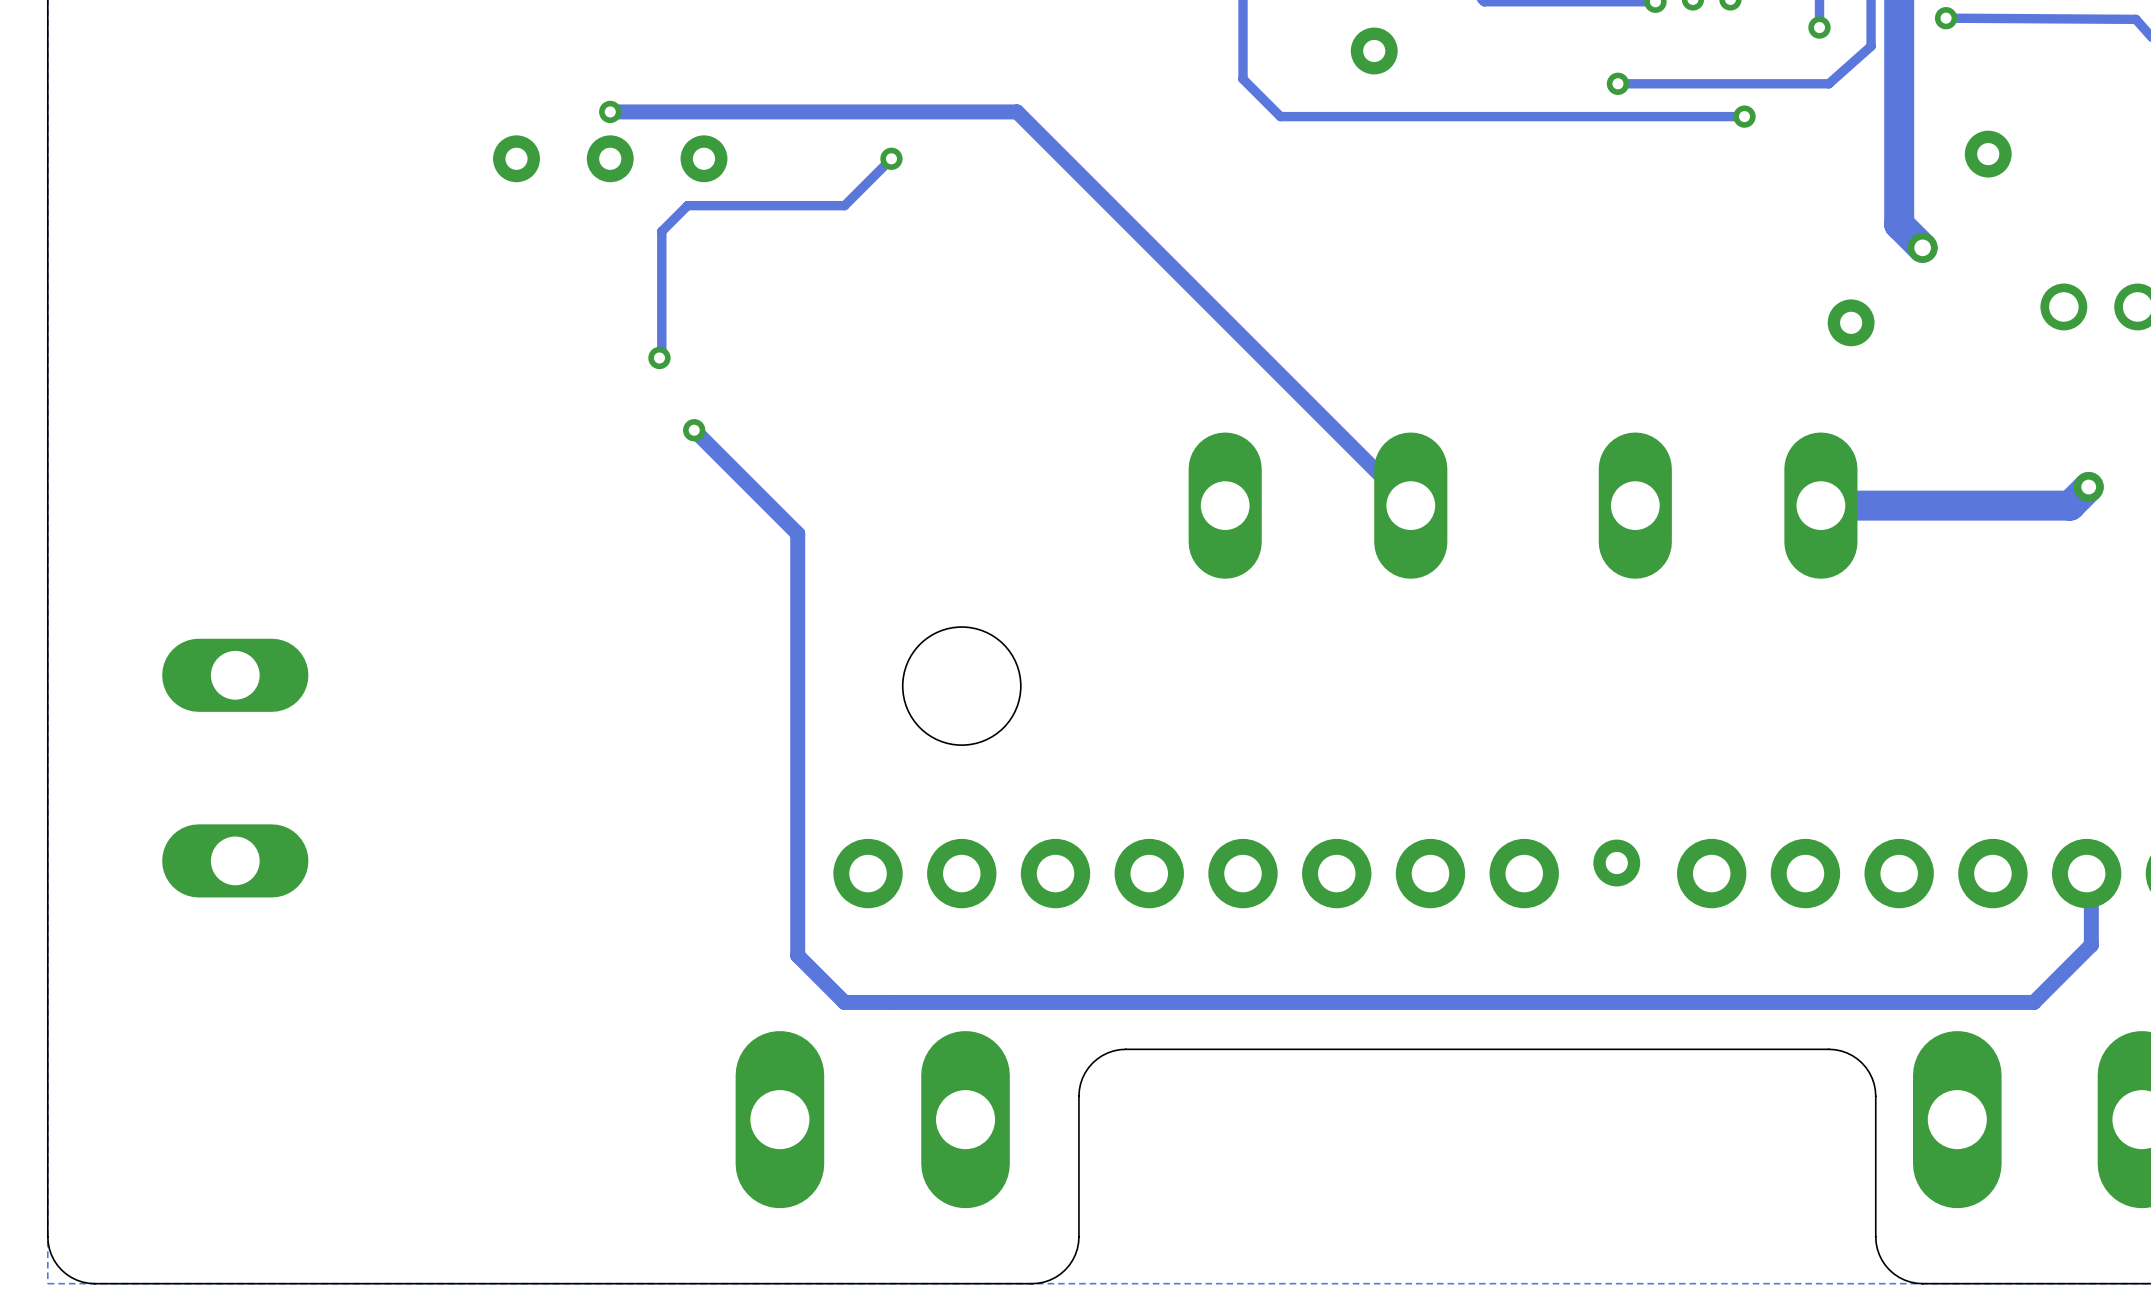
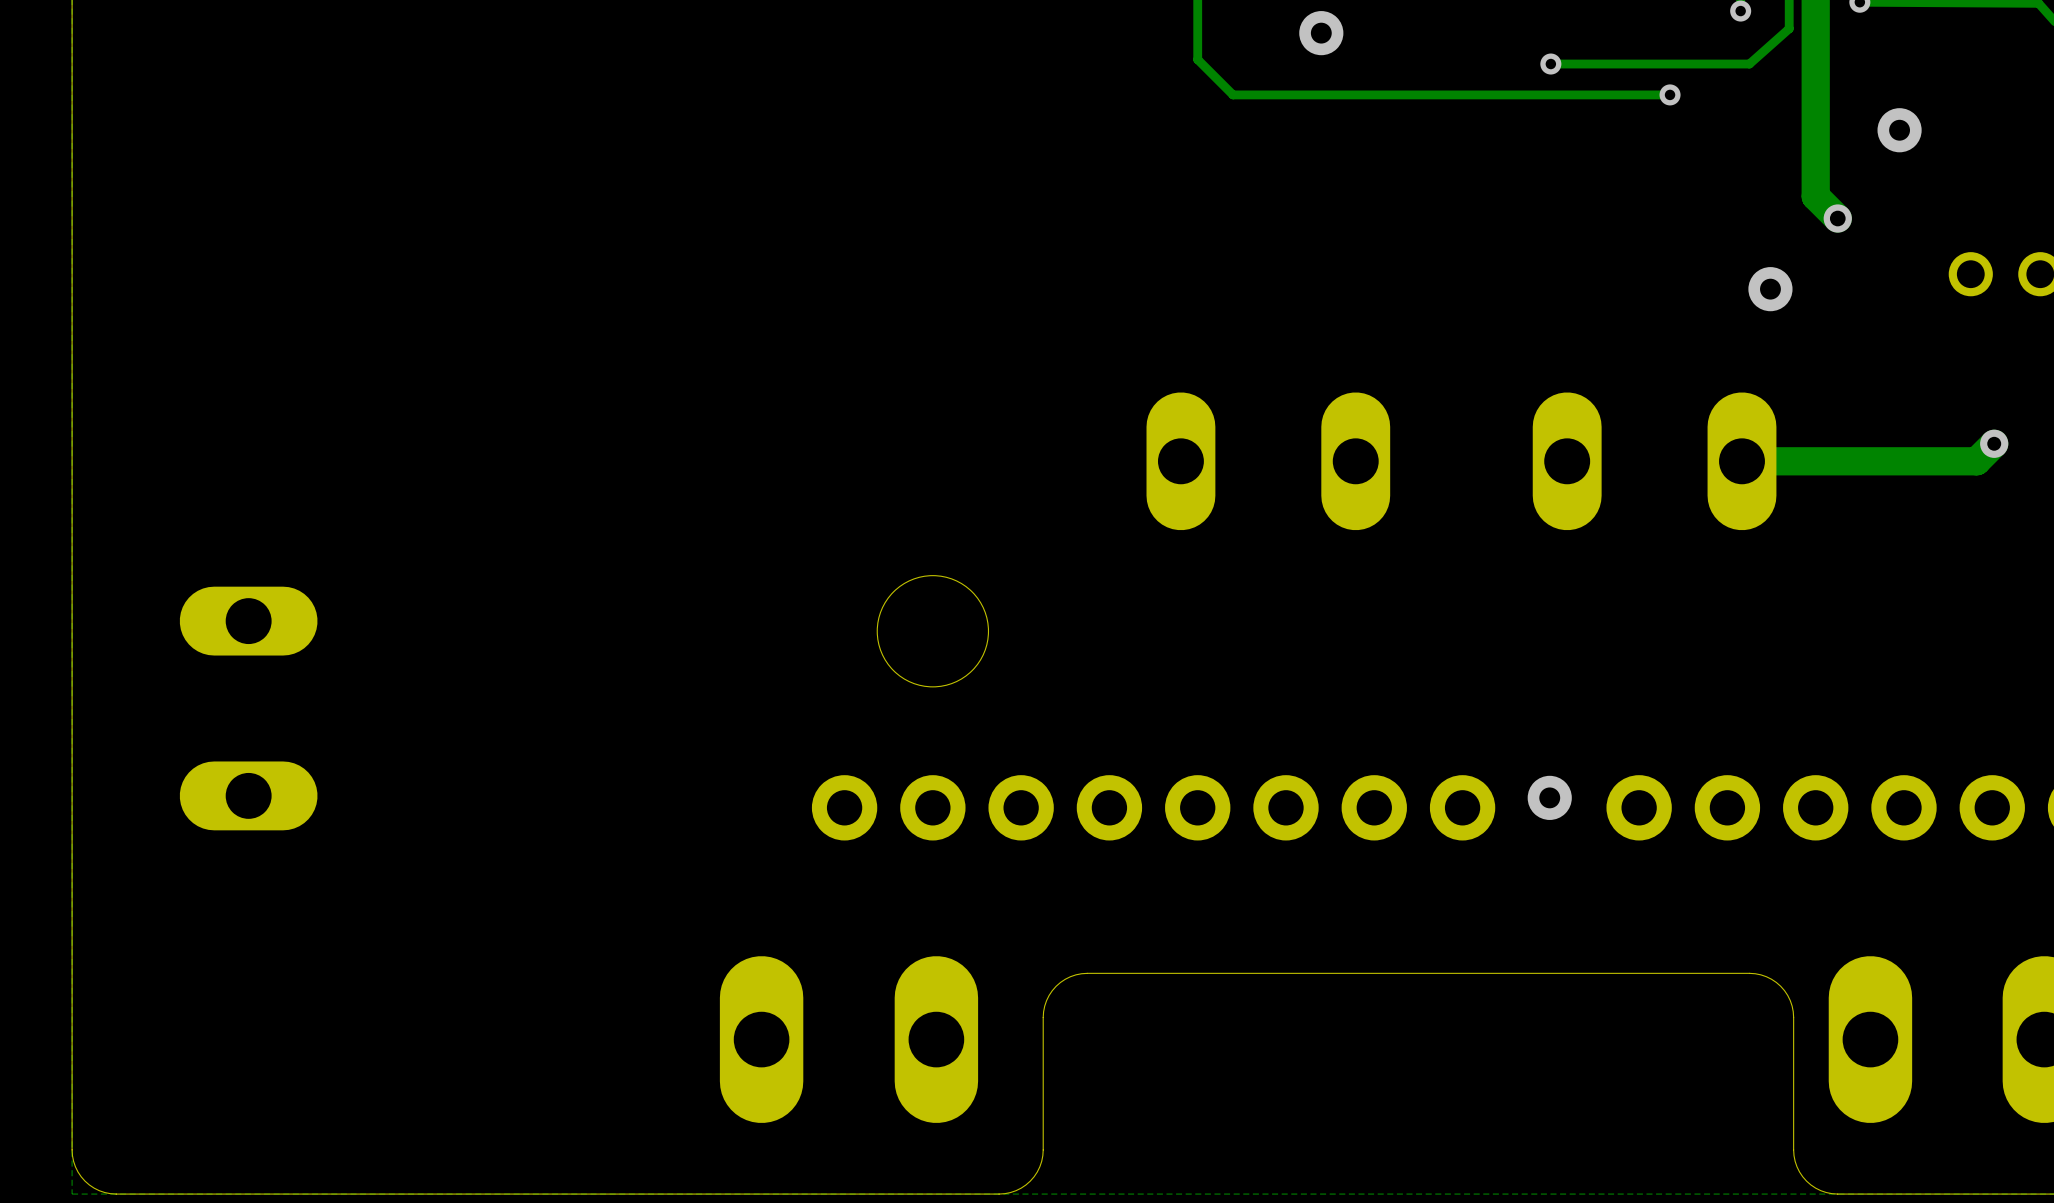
track: (610, 111) (1017, 111) (1410, 505) -> none
via: (610, 111) -> none
via: (516, 158) -> none
via: (610, 158) -> none
via: (703, 158) -> none
track: (891, 158) (844, 205) (687, 205) (661, 231) (661, 355) (659, 357) -> none
via: (891, 158) -> none
via: (659, 357) -> none
track: (694, 430) (797, 533) (797, 955) (844, 1002) (2033, 1002) (2091, 945) (2091, 878) (2086, 873) -> none
via: (694, 430) -> none

